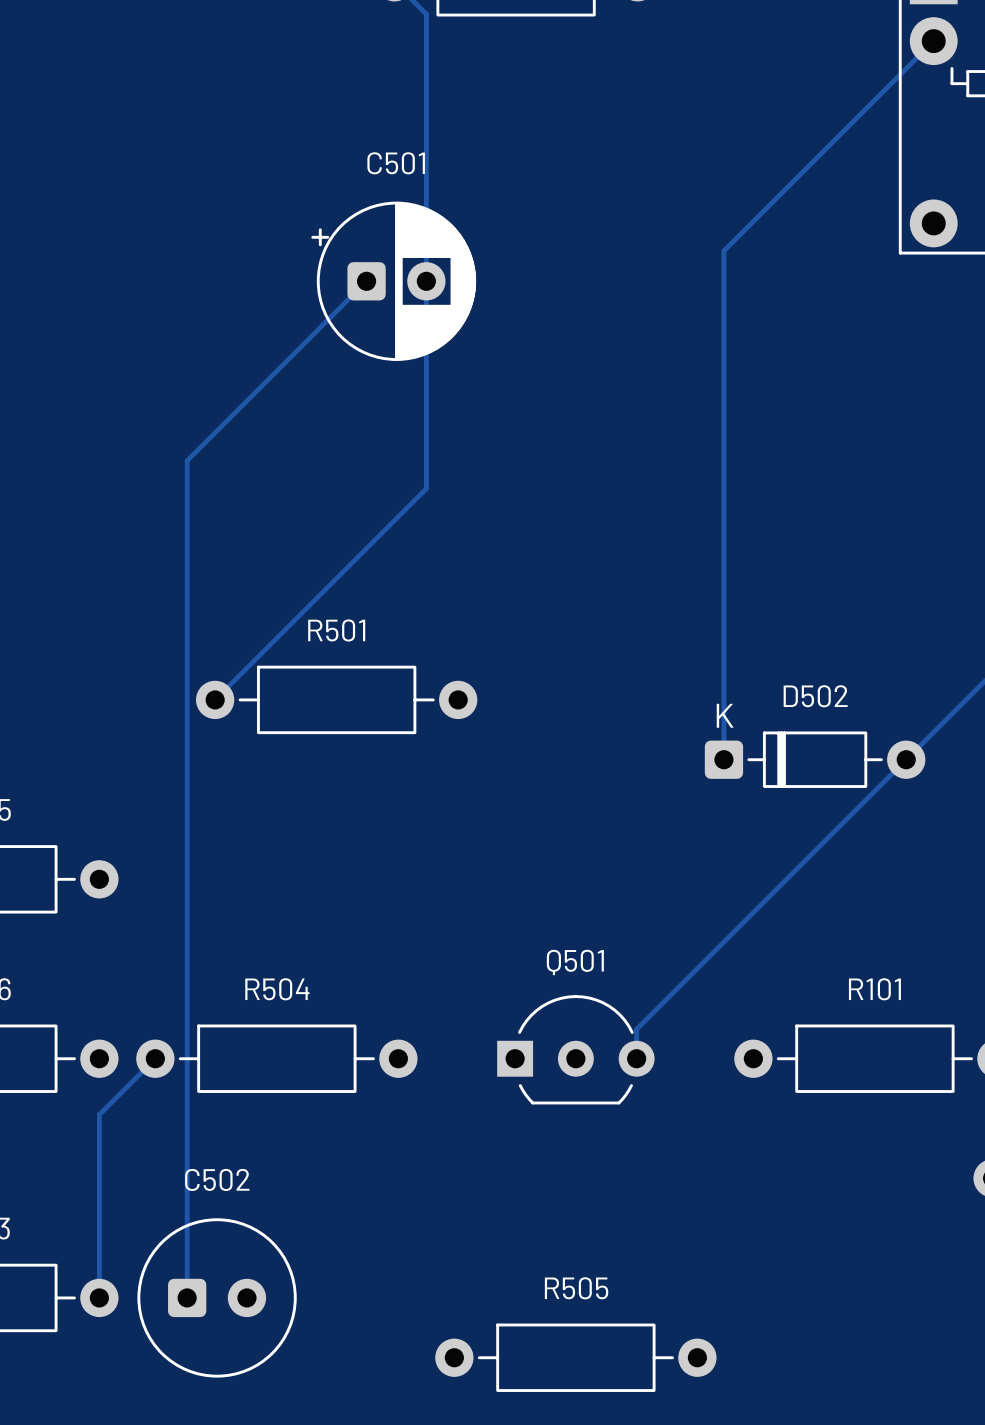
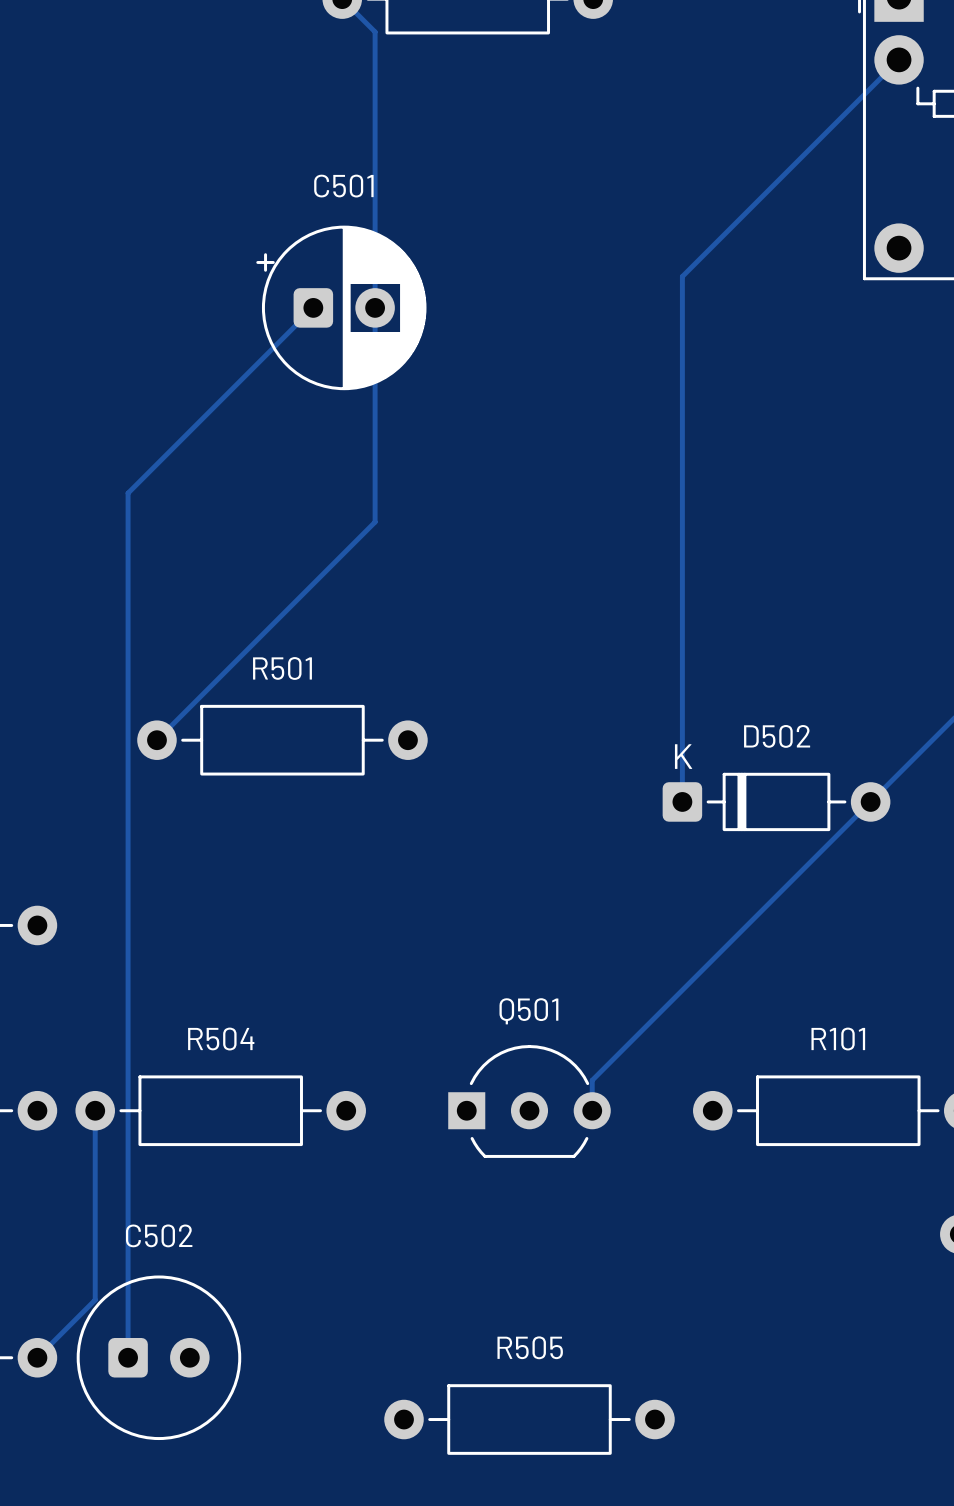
track: (155, 1058) (99, 1114) (99, 1297) -> (95, 1110) (95, 1299) (37, 1357)

